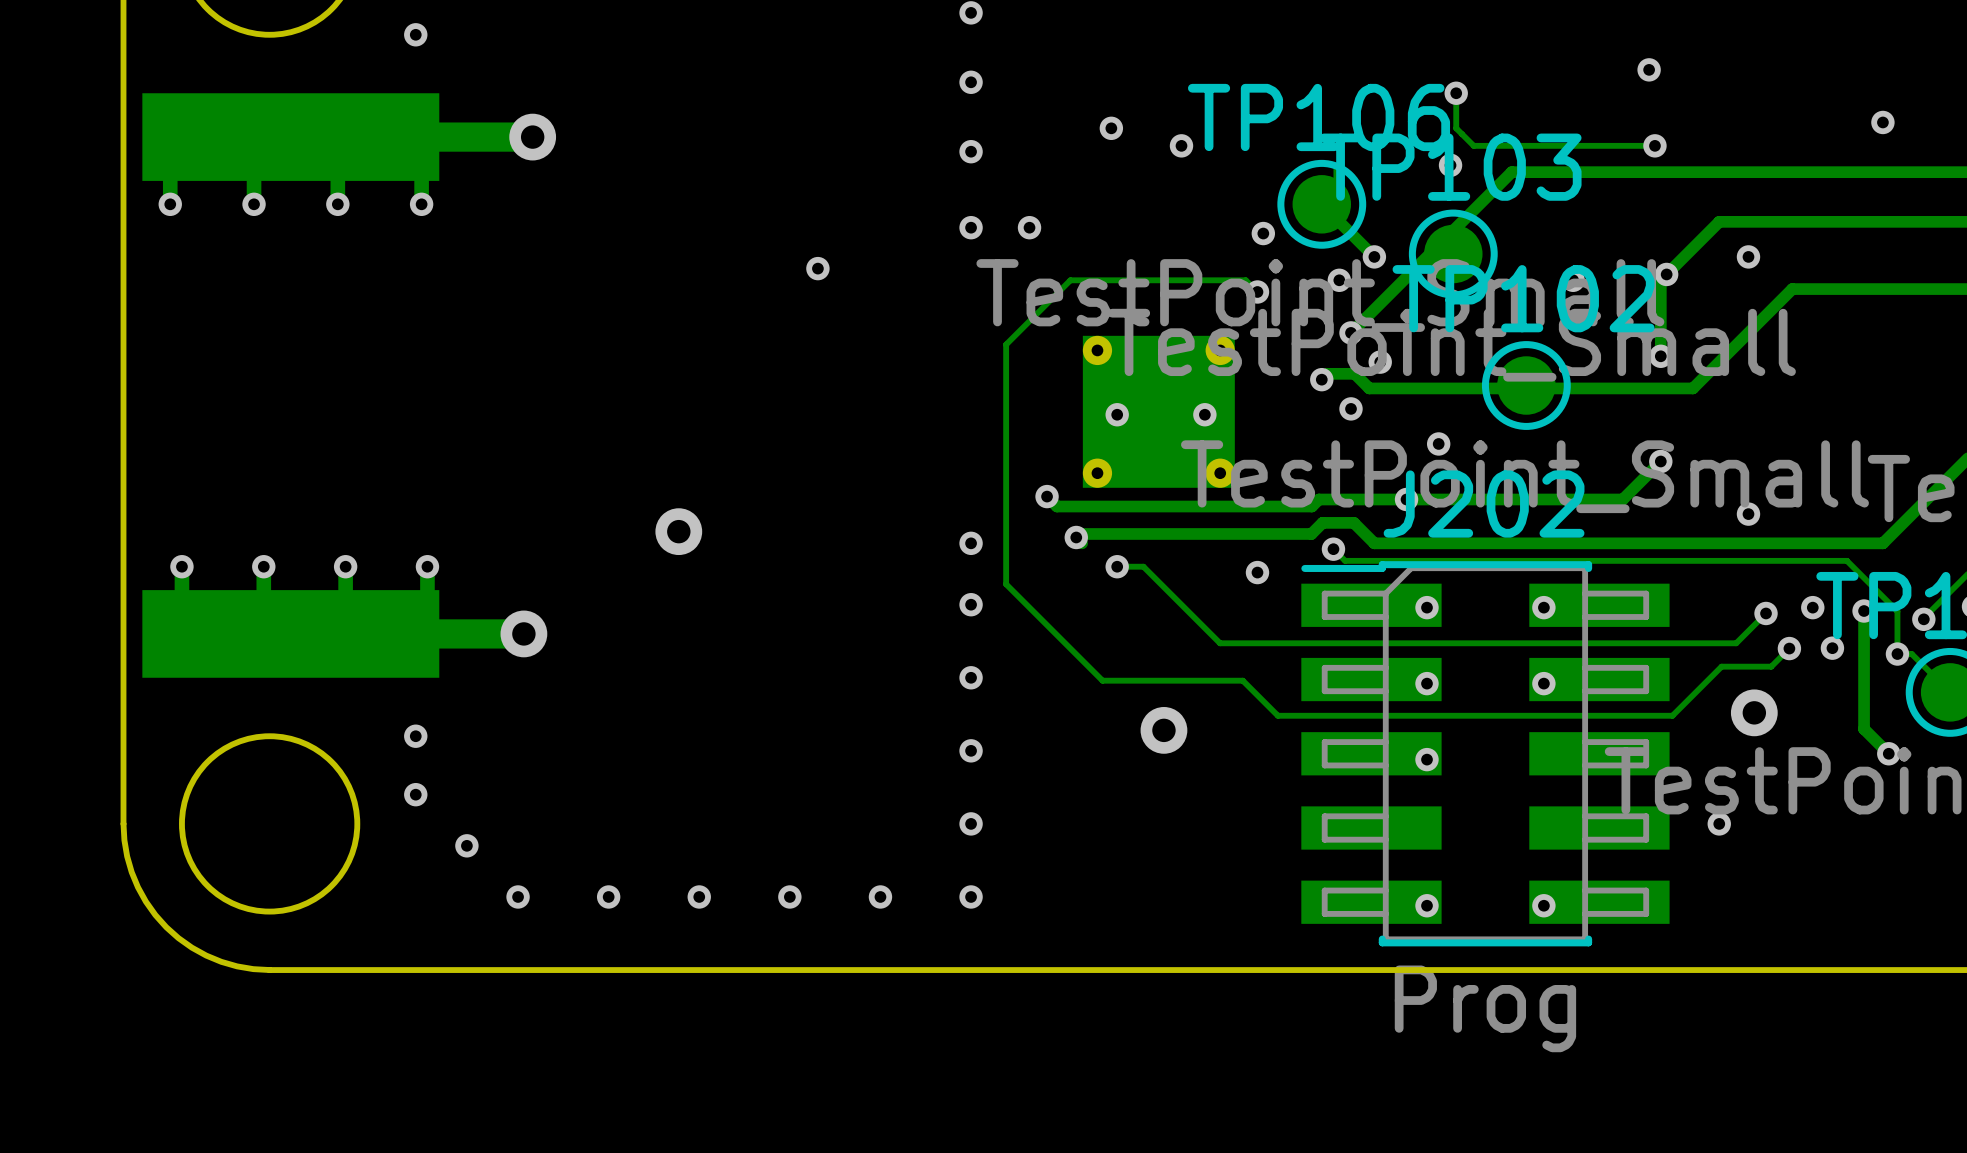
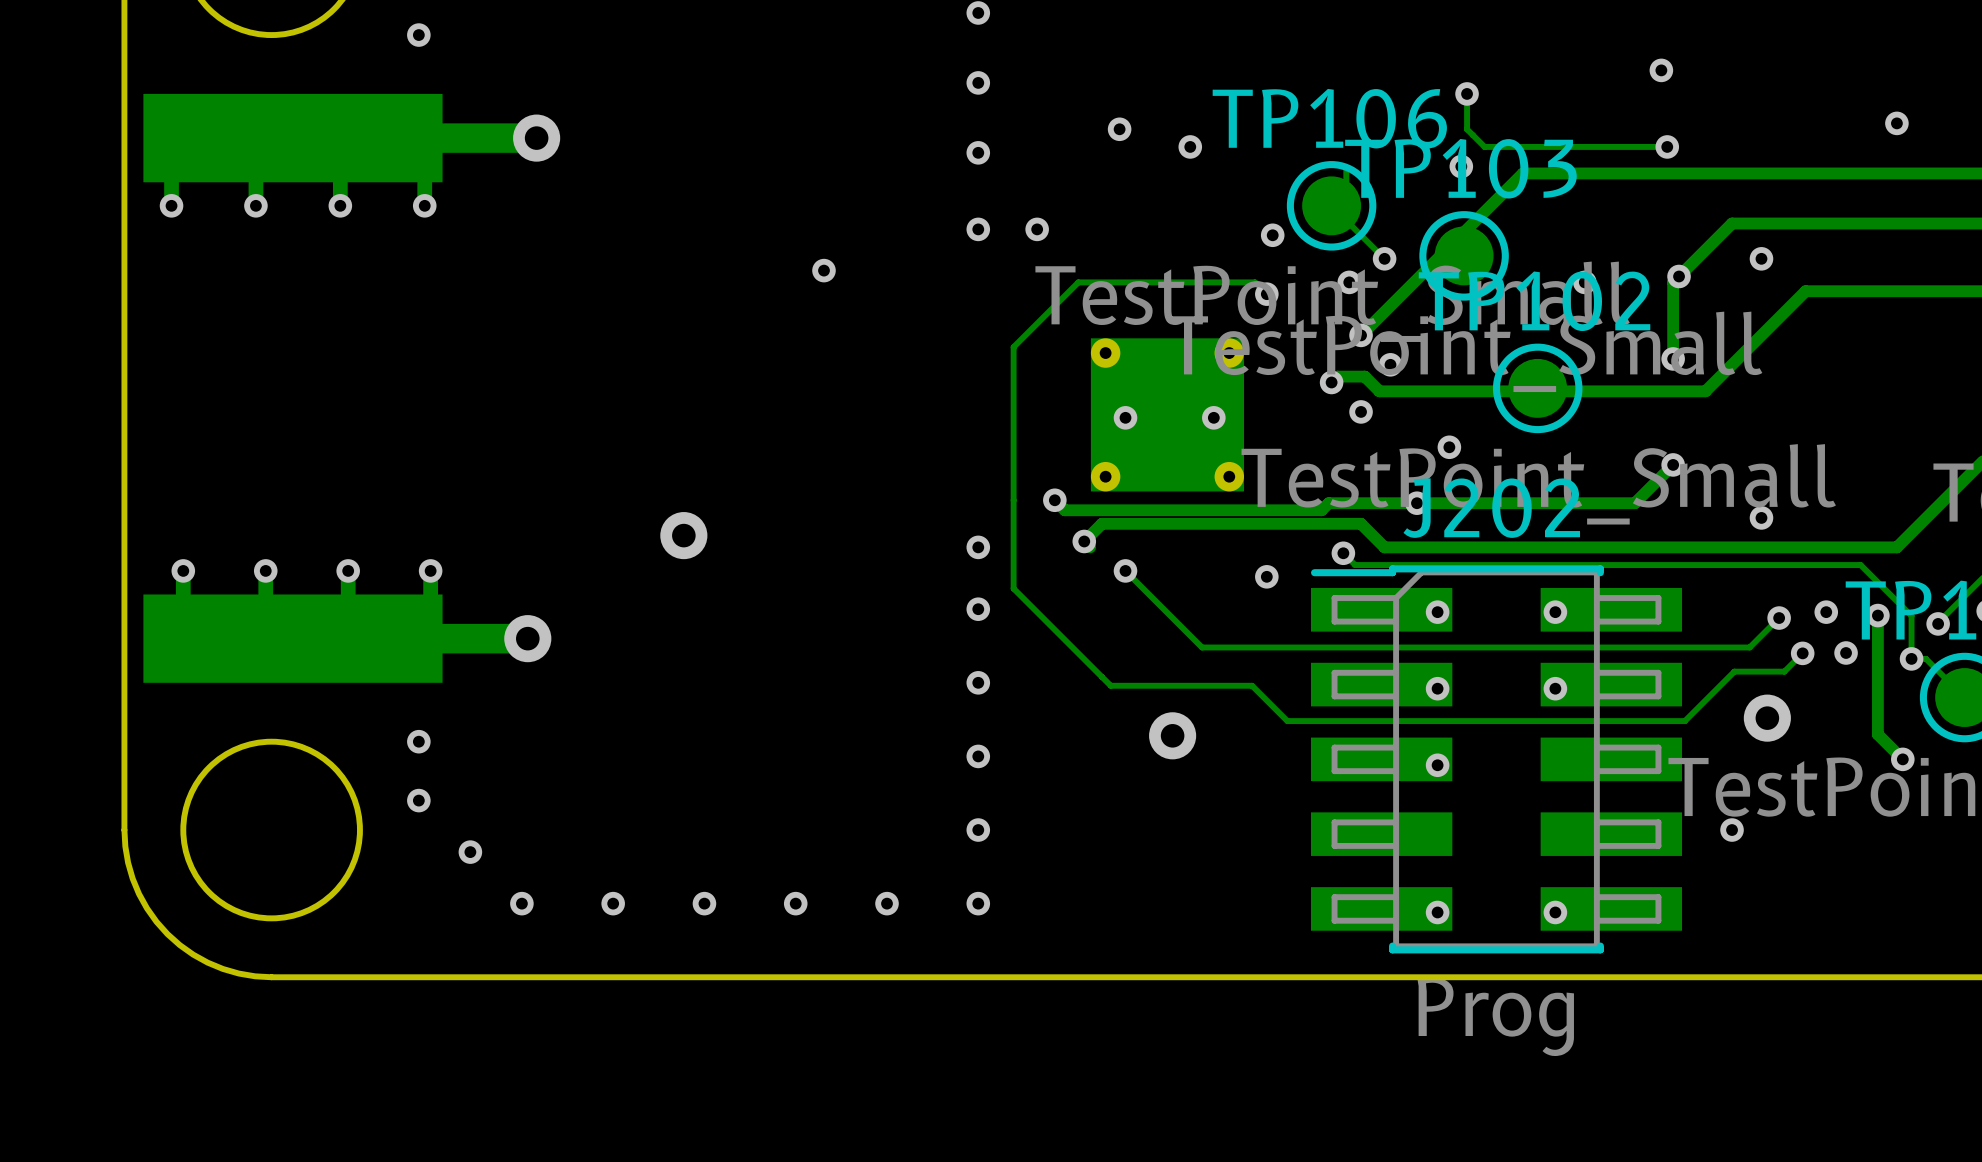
track width: thick (1336, 218) (1374, 256) -> thin (1346, 220) (1384, 258)
track: (1353, 522) (1322, 522) (1311, 533) (1079, 533) -> (1363, 526) (1361, 523) (1101, 523) (1087, 537)
track: (1117, 566) (1143, 566) (1220, 643) (1736, 643) -> (1125, 570) (1202, 647) (1749, 647)

